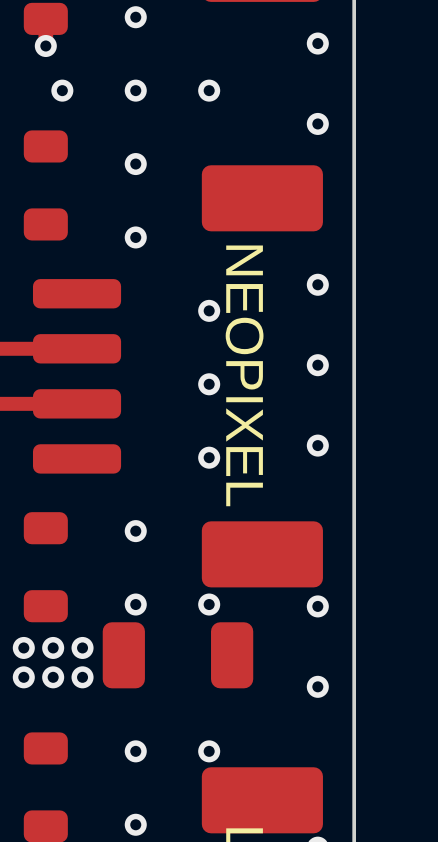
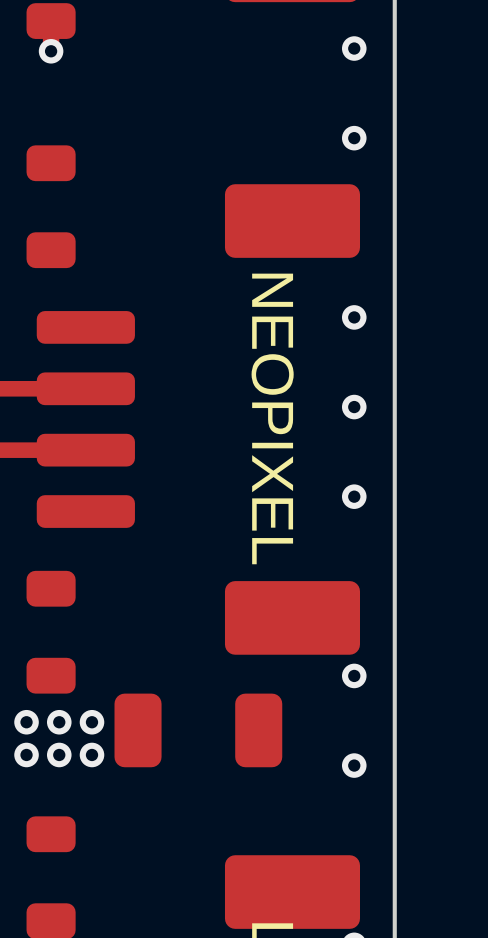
via: (135, 17) -> none
via: (62, 90) -> none
via: (135, 90) -> none
via: (209, 90) -> none
via: (135, 164) -> none
via: (135, 237) -> none
via: (209, 310) -> none
via: (209, 384) -> none
via: (209, 457) -> none
via: (135, 531) -> none
via: (135, 604) -> none
via: (209, 604) -> none
via: (135, 751) -> none
via: (209, 751) -> none
via: (135, 824) -> none

